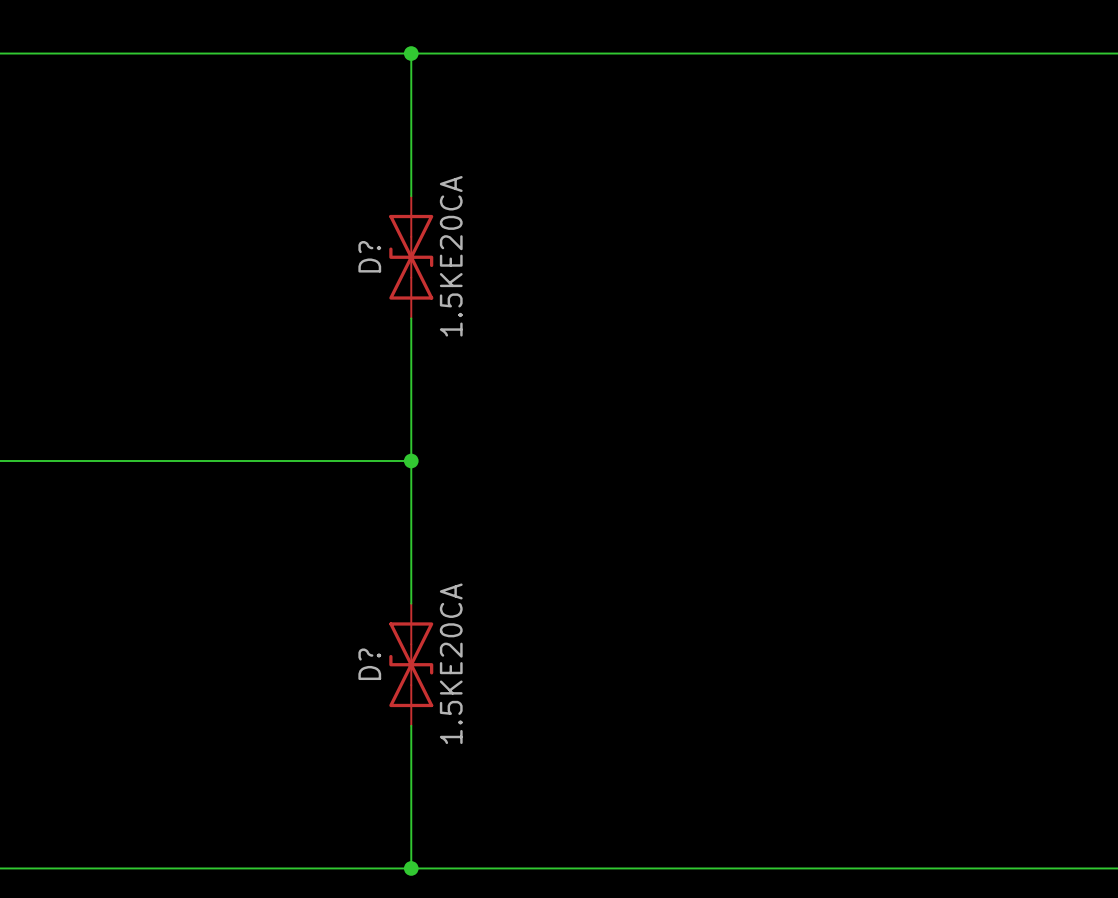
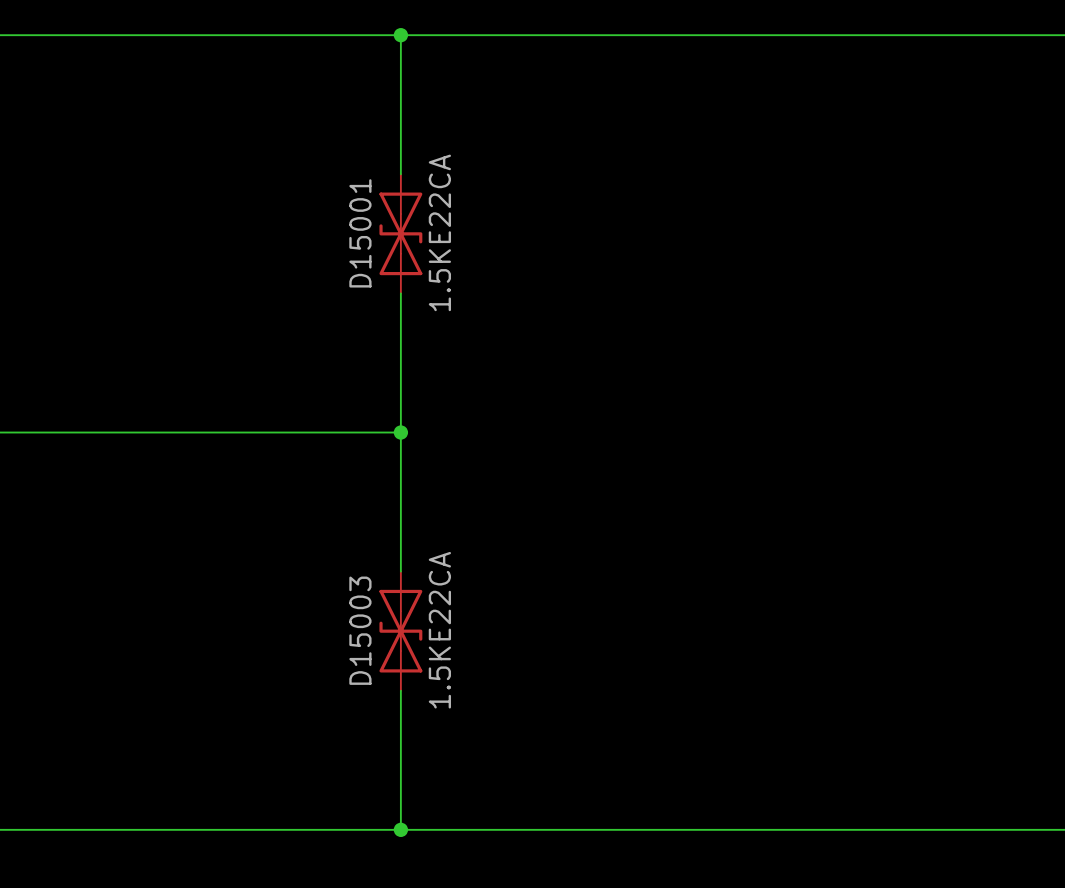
D? name: D? (369, 256) -> D15001 (360, 233)
D? value: 1.5KE20CA (451, 256) -> 1.5KE22CA (439, 232)
D? value: 1.5KE20CA (451, 663) -> 1.5KE22CA (439, 630)
D? name: D? (369, 664) -> D15003 (360, 630)

